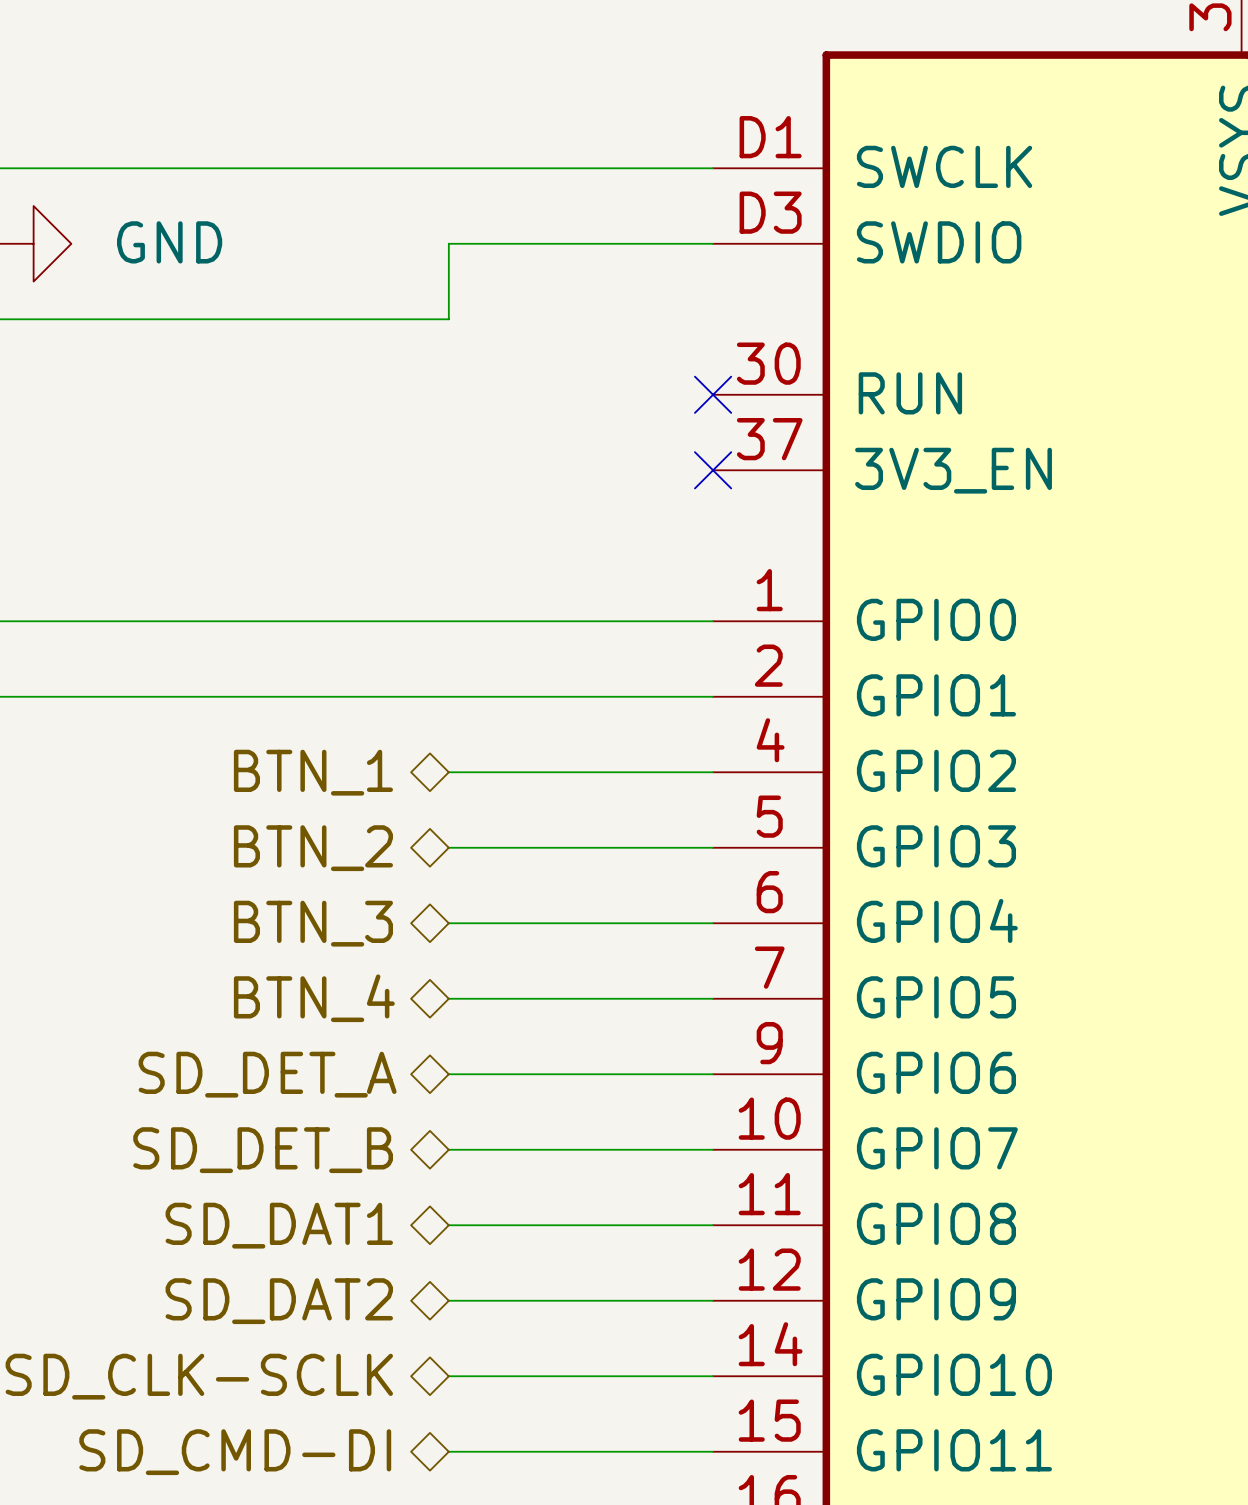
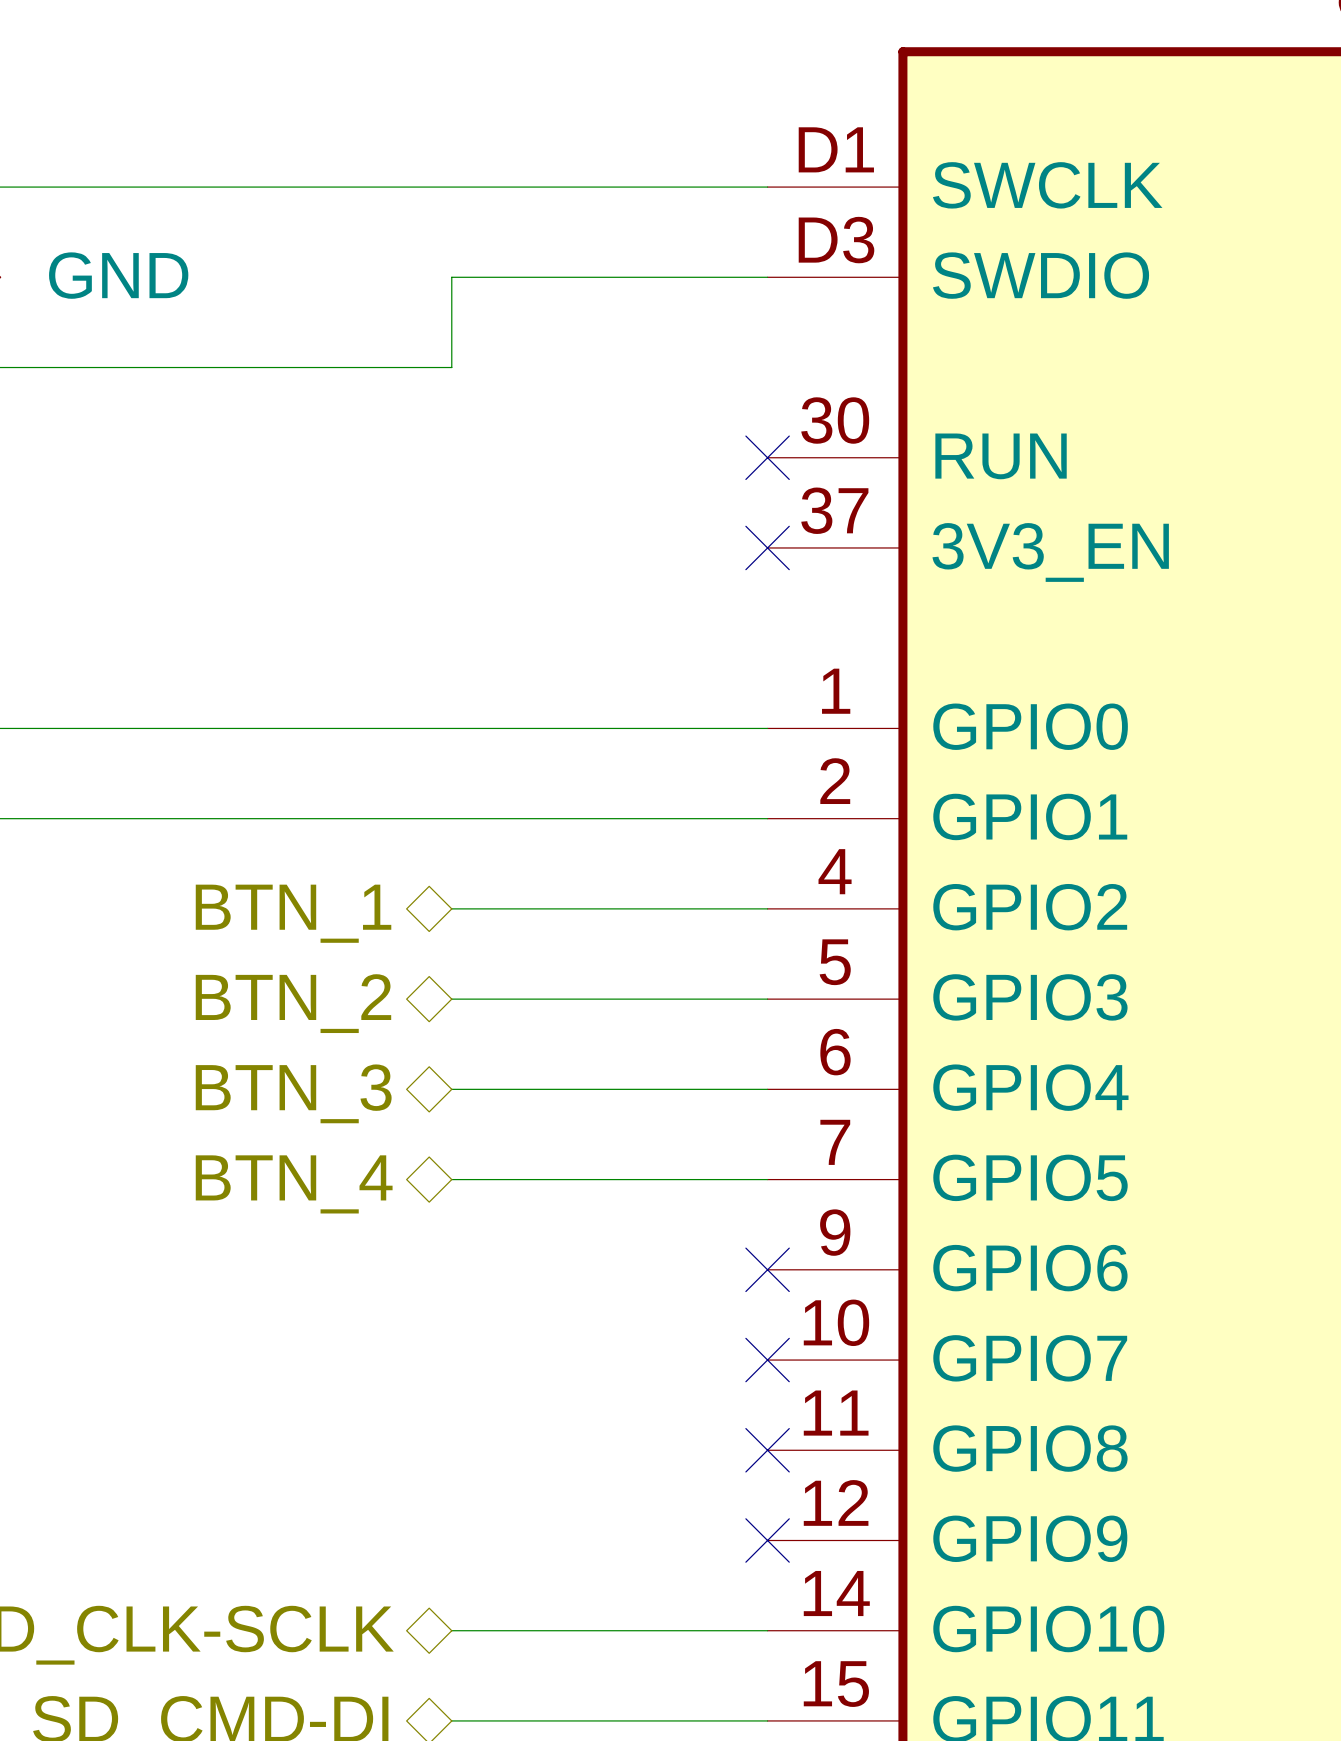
hierarchical label: SD_DET_A (267, 1074) -> none
wire: (448, 1074) (713, 1074) -> none
no-connect mark: none -> (767, 1269)
wire: (448, 1149) (713, 1149) -> none
no-connect mark: none -> (767, 1360)
hierarchical label: SD_DET_B (263, 1150) -> none
hierarchical label: SD_DAT1 (279, 1225) -> none
wire: (448, 1225) (713, 1225) -> none
no-connect mark: none -> (767, 1450)
wire: (448, 1300) (713, 1300) -> none
no-connect mark: none -> (767, 1540)
hierarchical label: SD_DAT2 (279, 1301) -> none

